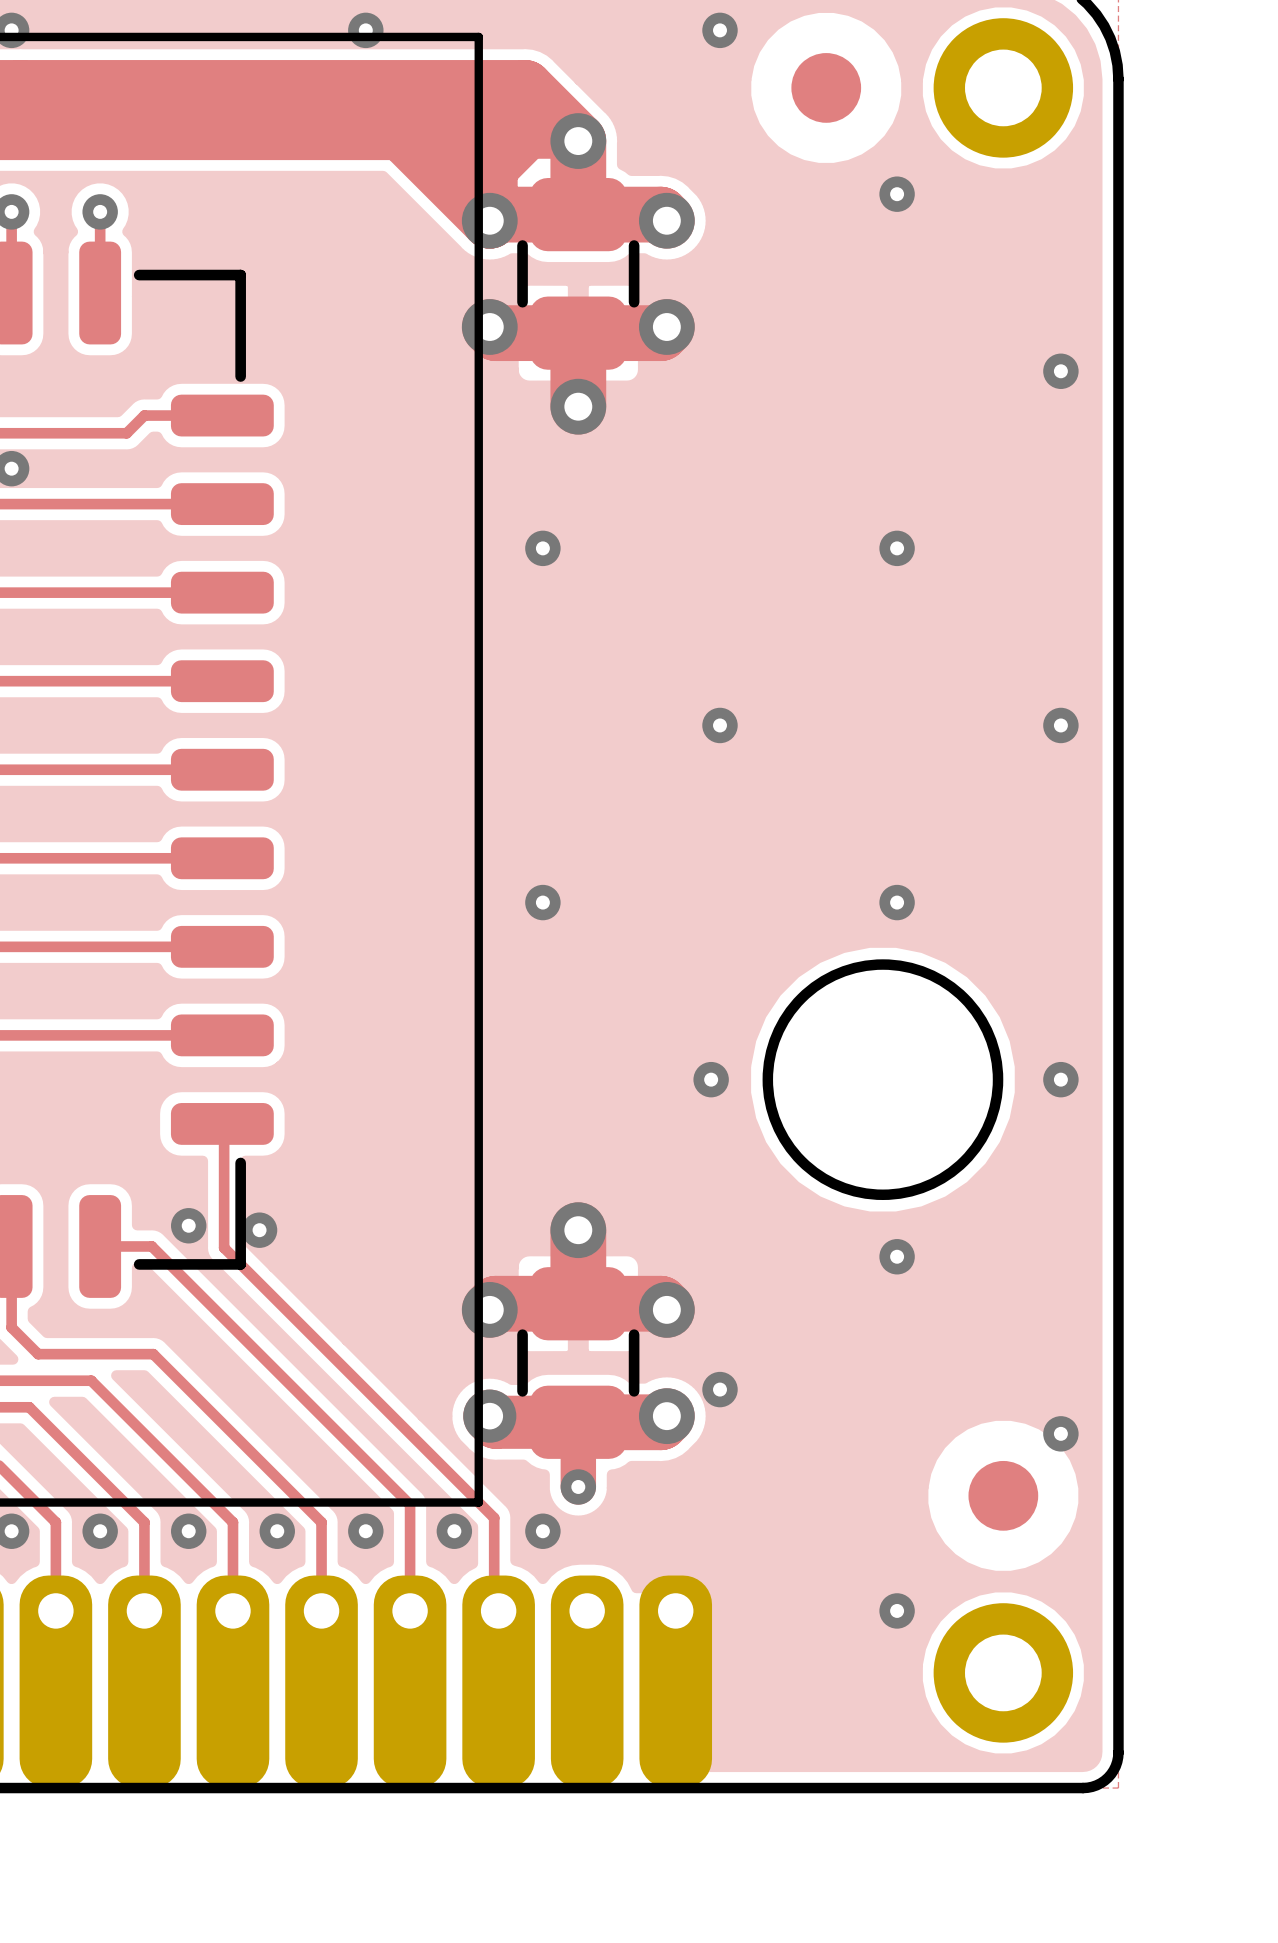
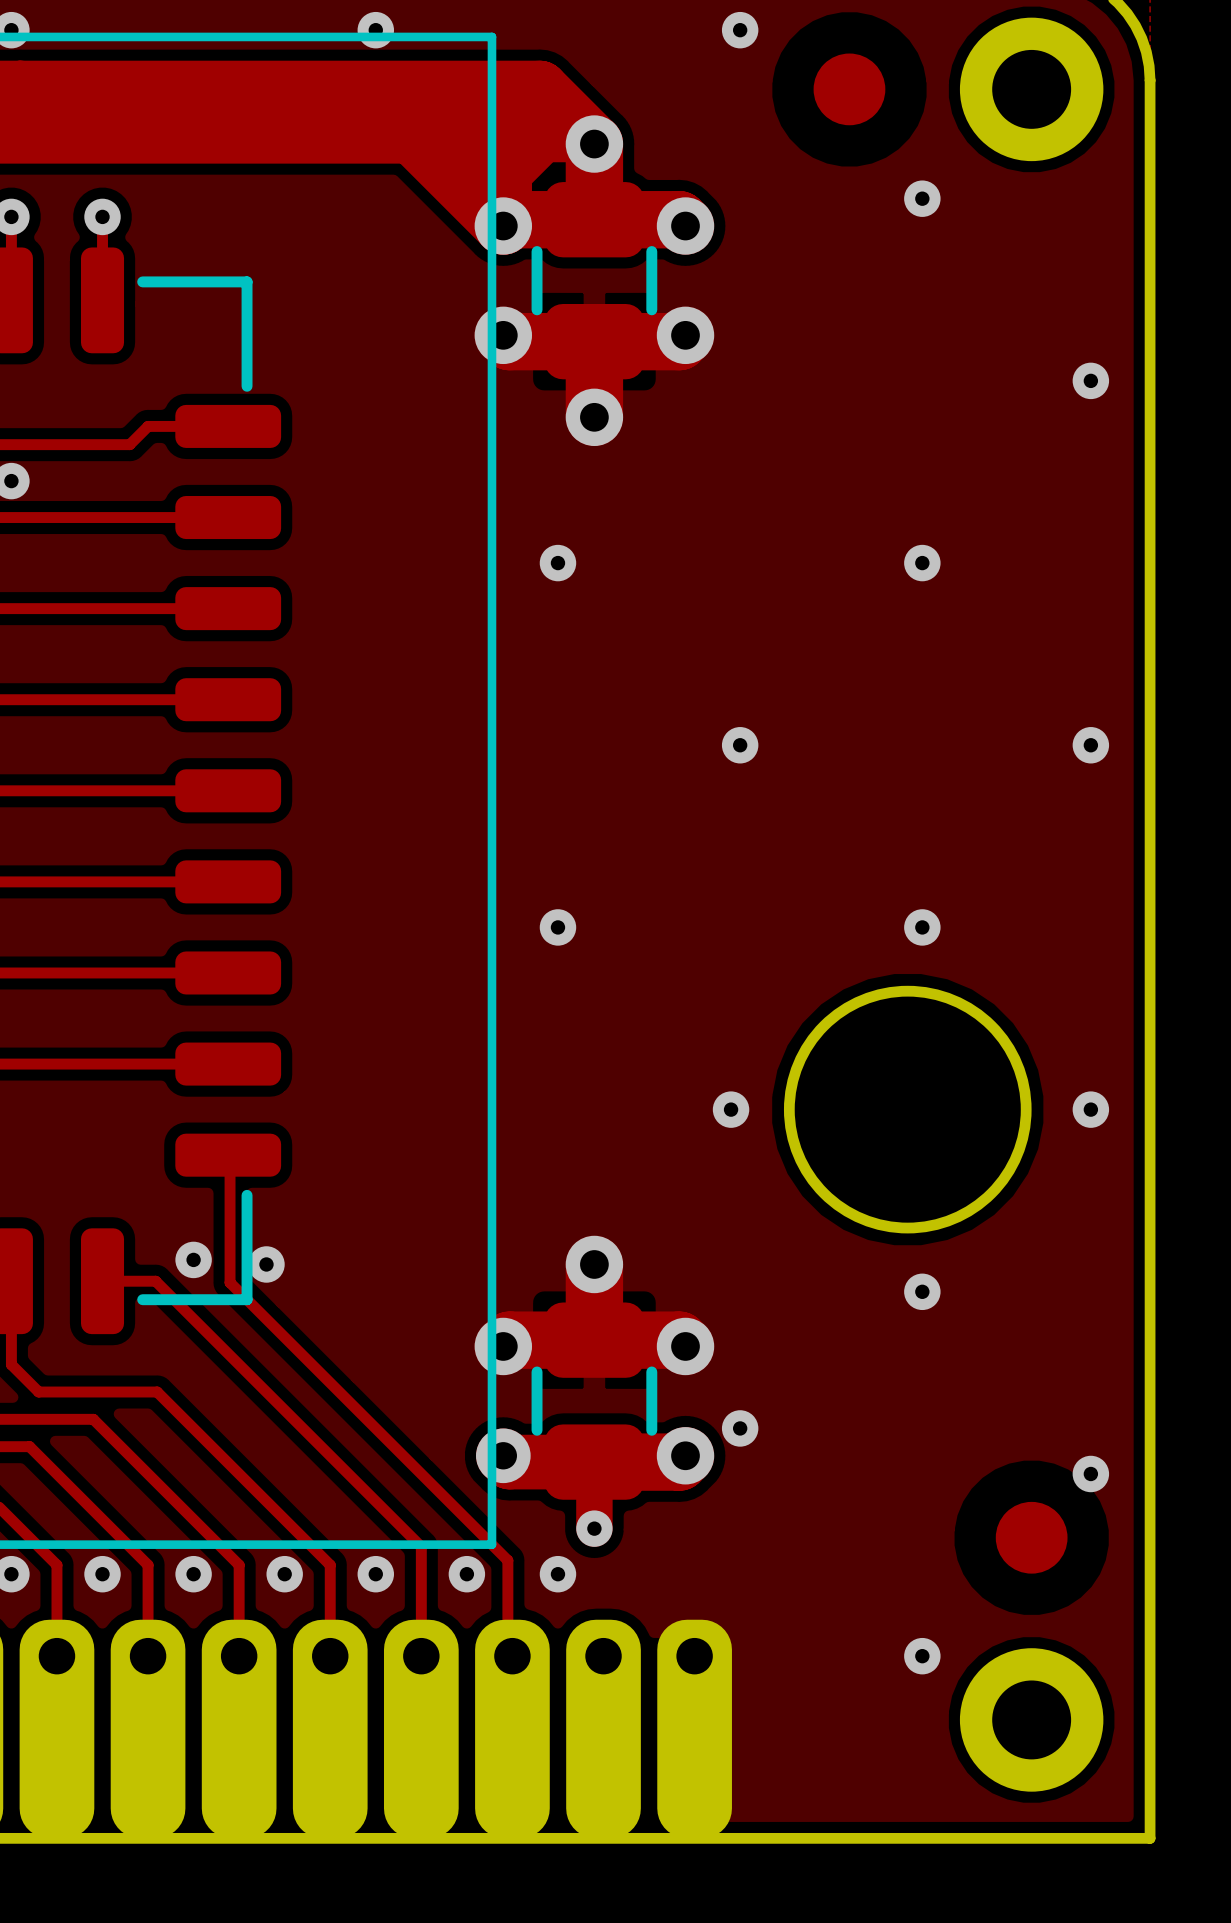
board edge: (1118, 1752) (1115, 1766) (1108, 1777) (1096, 1785) (1083, 1788) -> (1150, 1801) (1150, 1838) (1113, 1838)

